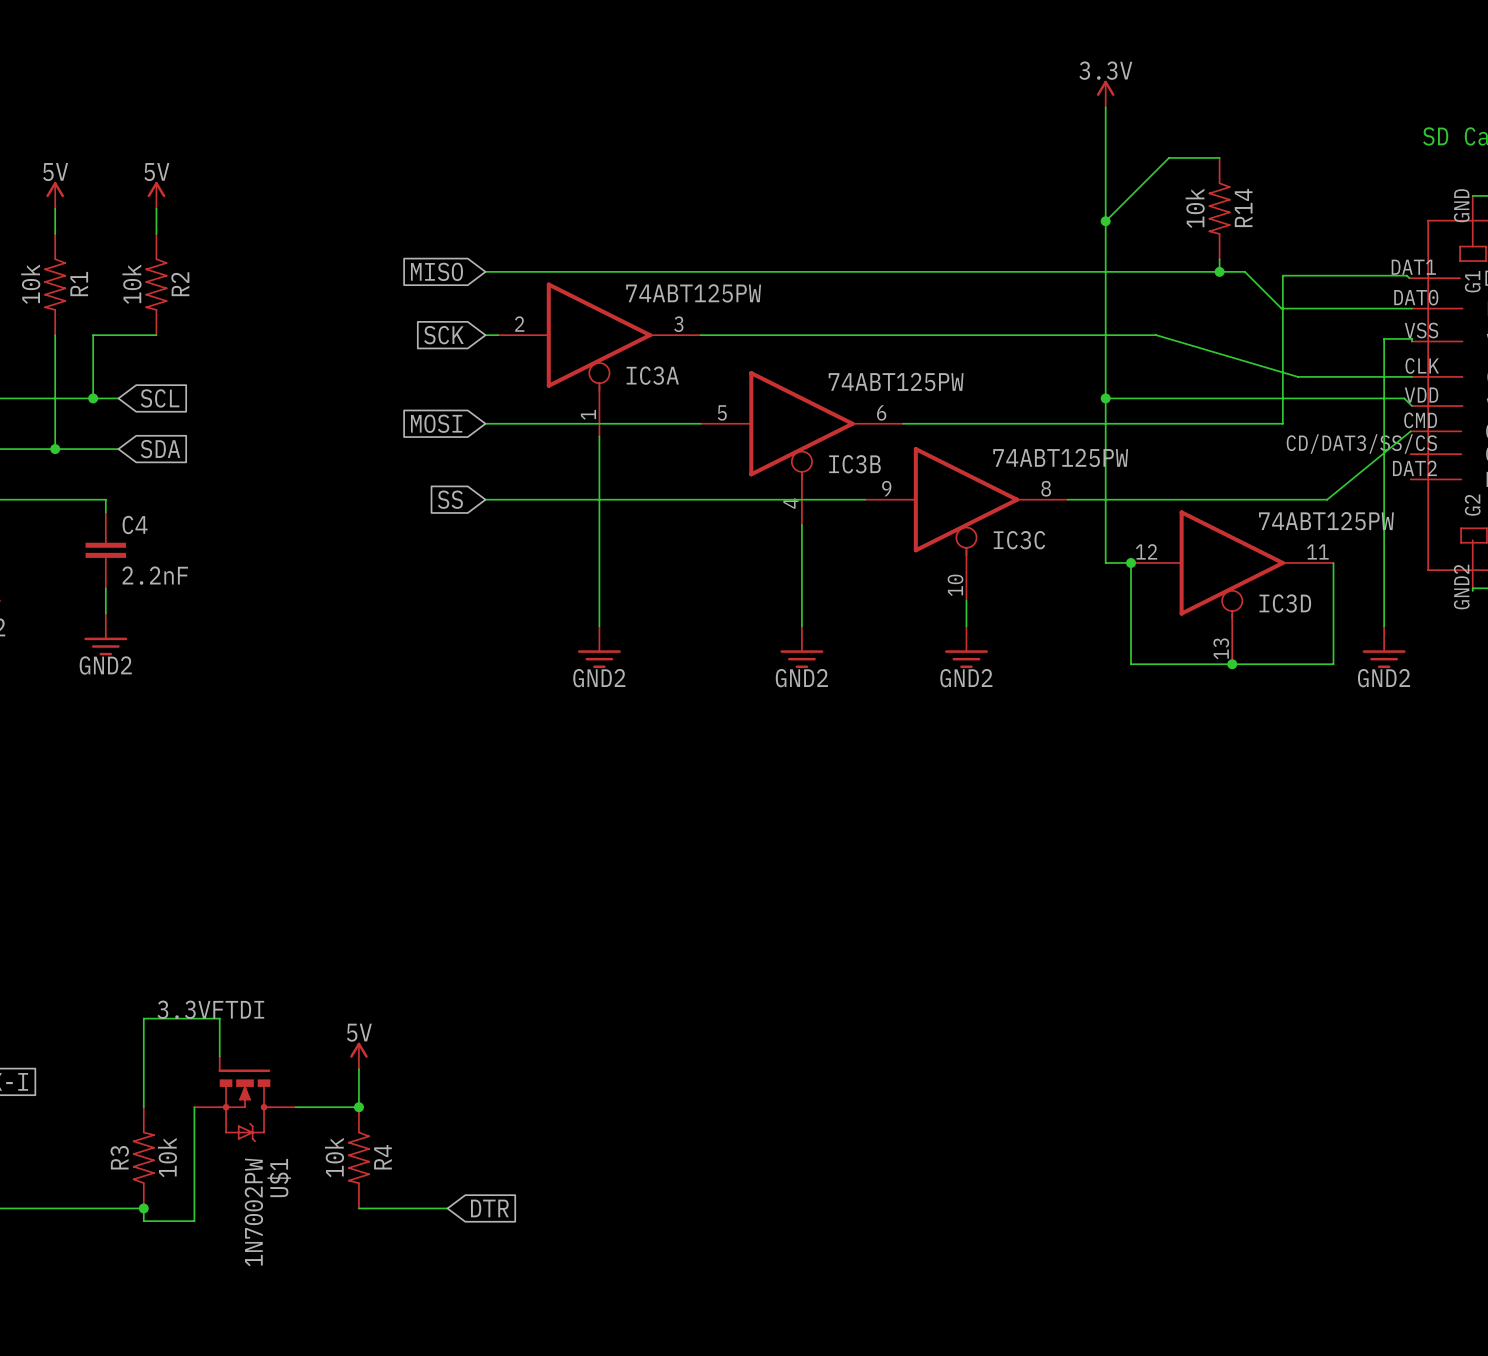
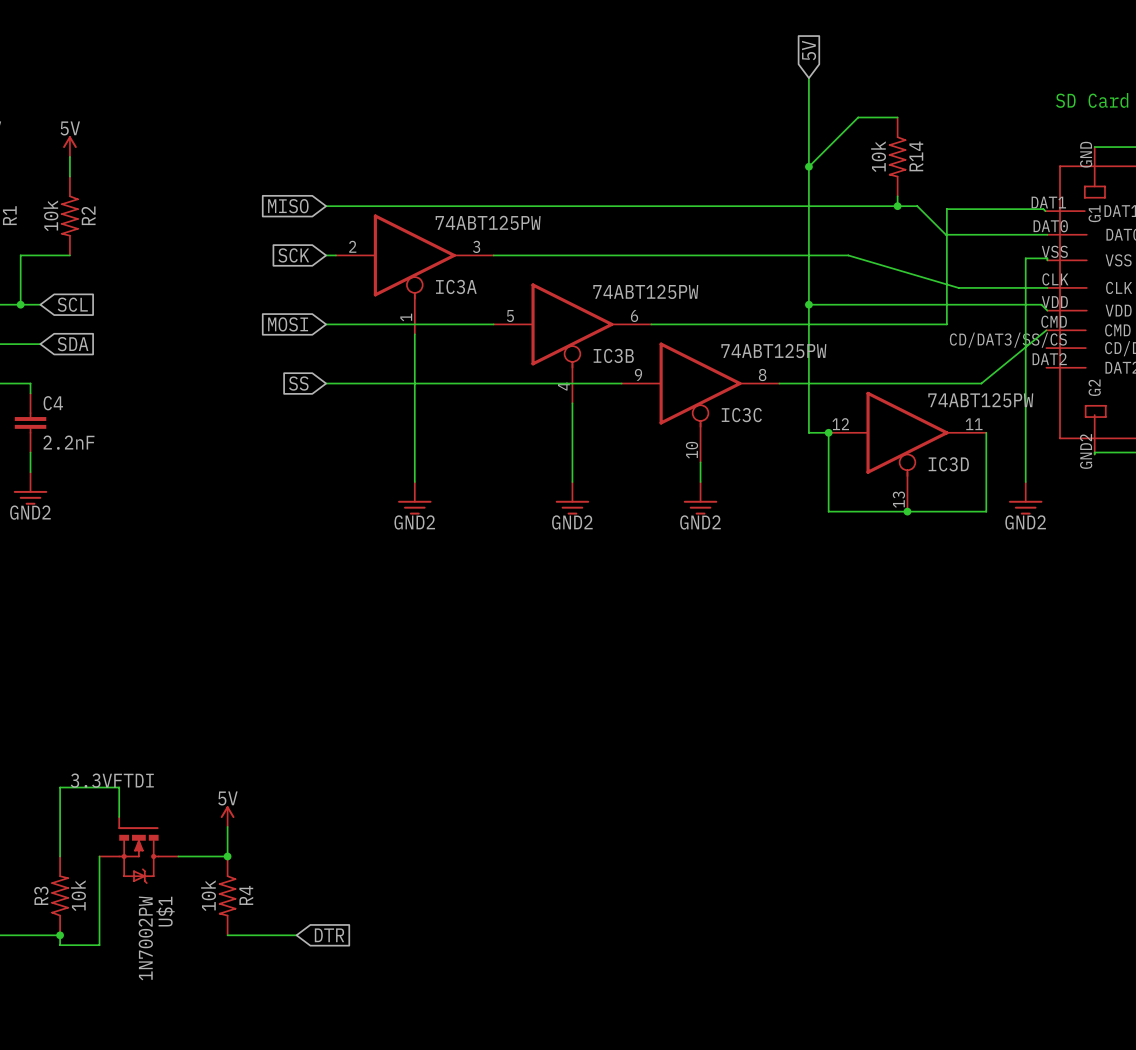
global label: none -> 5V (809, 50)
power symbol: 3.3V (1105, 94) -> none

